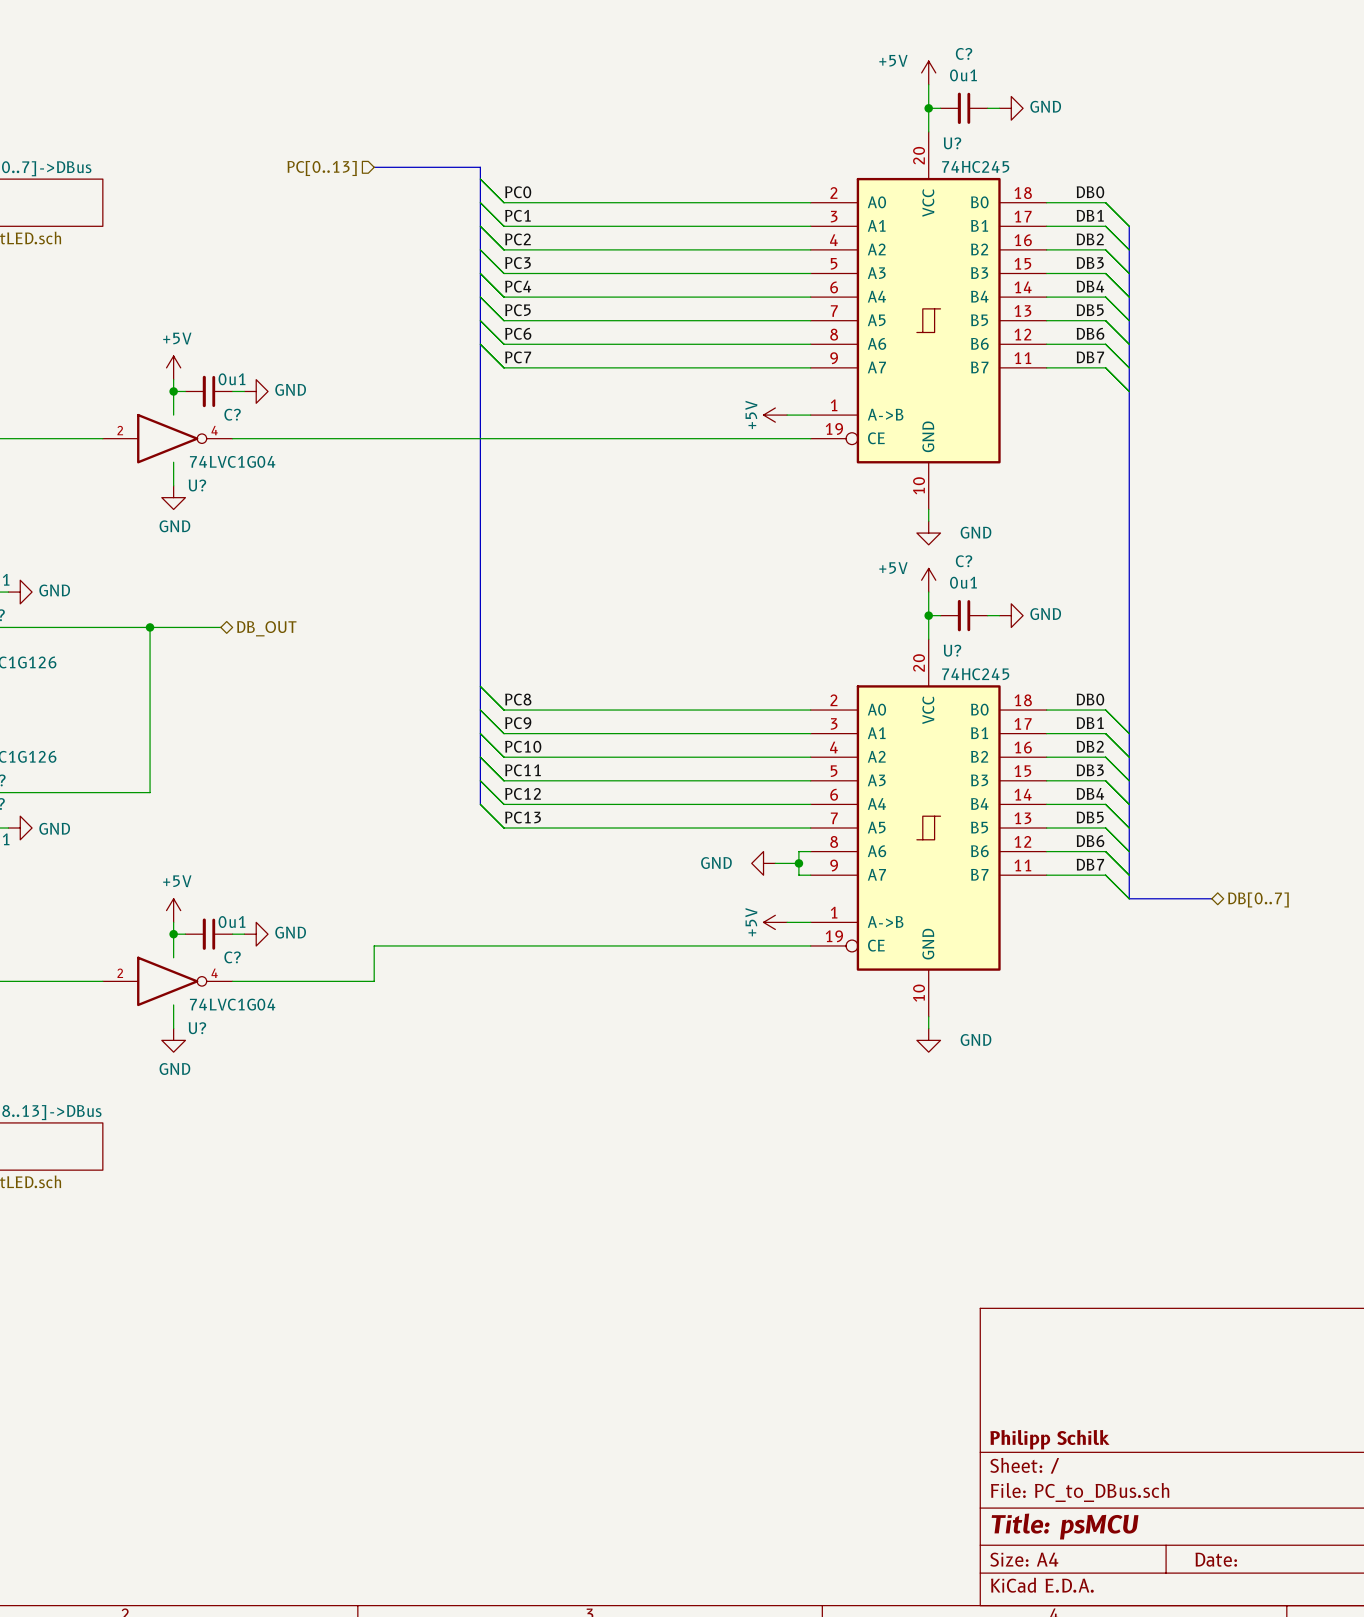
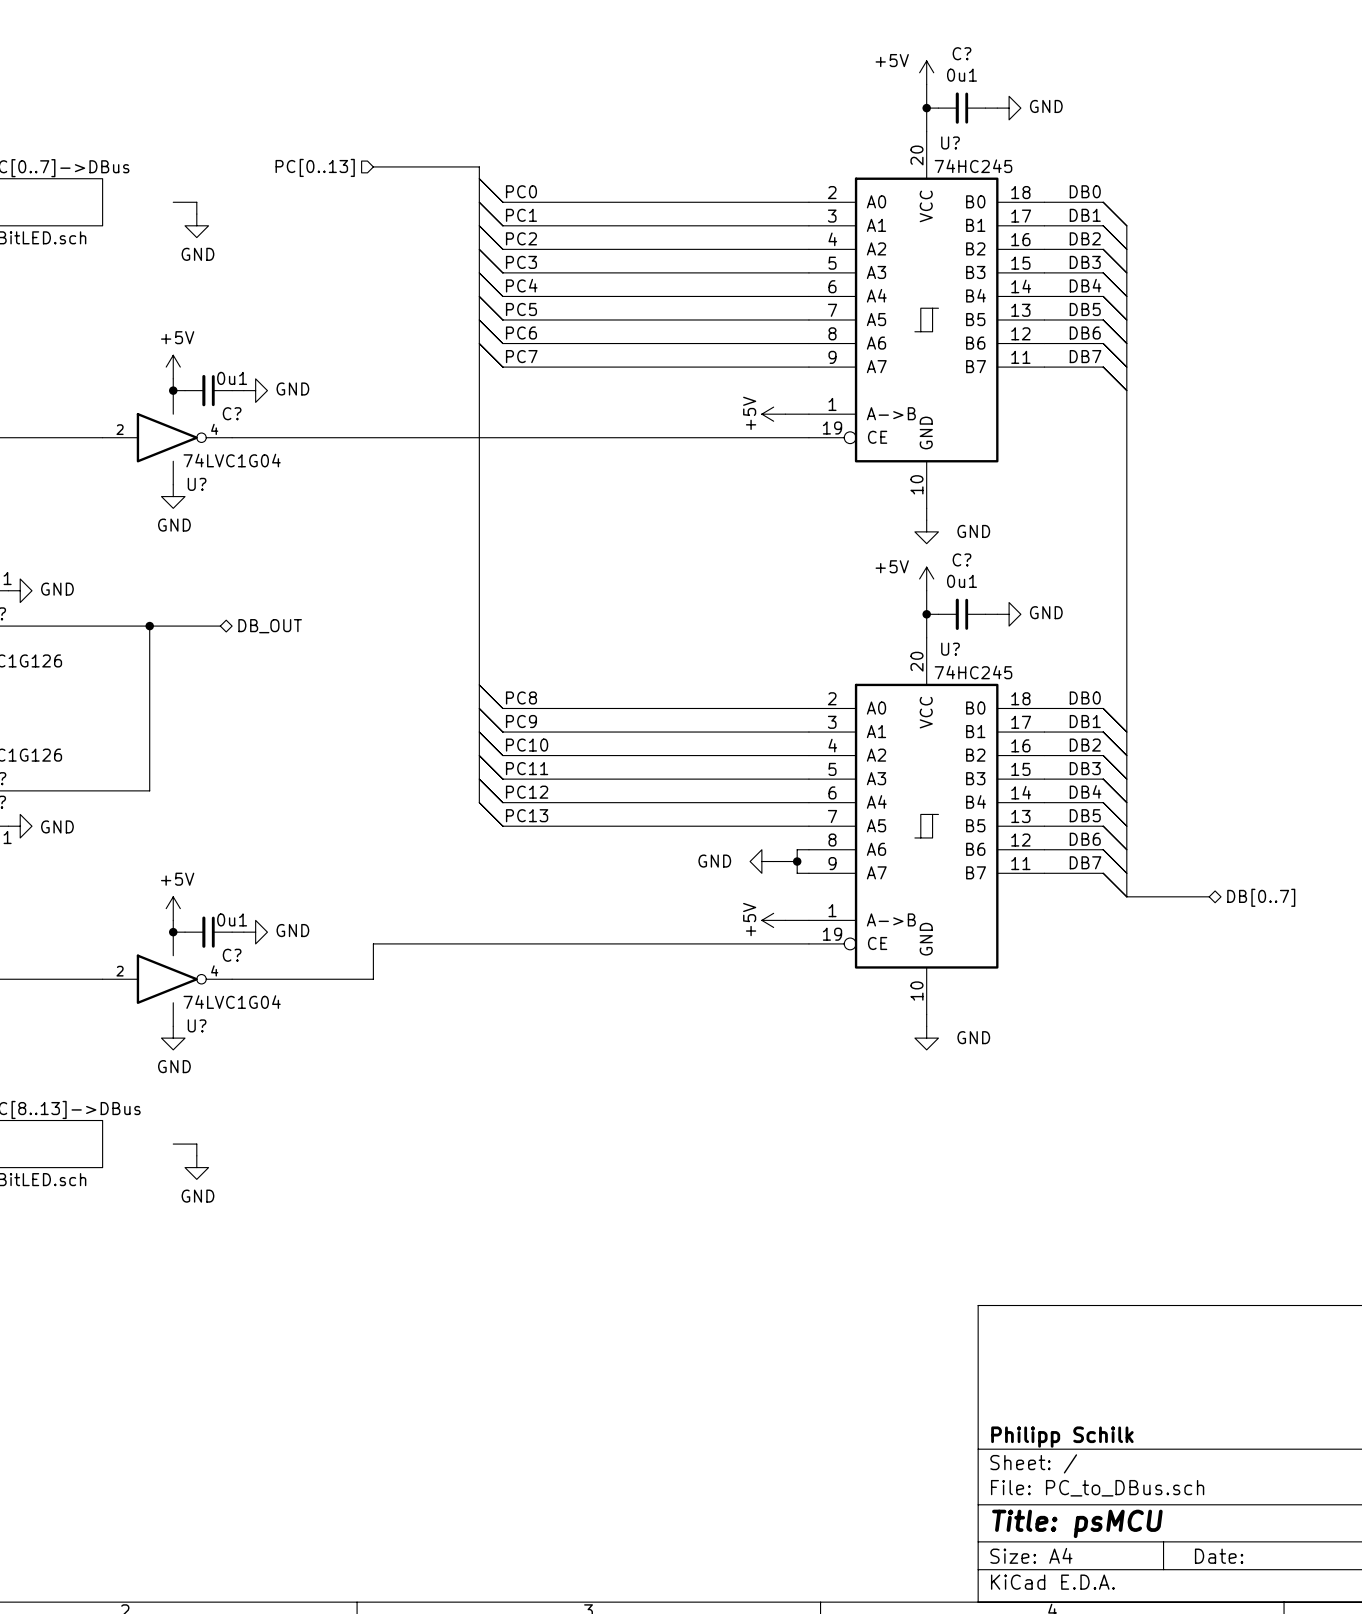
wire: none -> (173, 202) (196, 202) (196, 214)
power symbol: none -> GND (196, 225)
wire: none -> (173, 1144) (196, 1144) (196, 1155)
power symbol: none -> GND (196, 1167)

